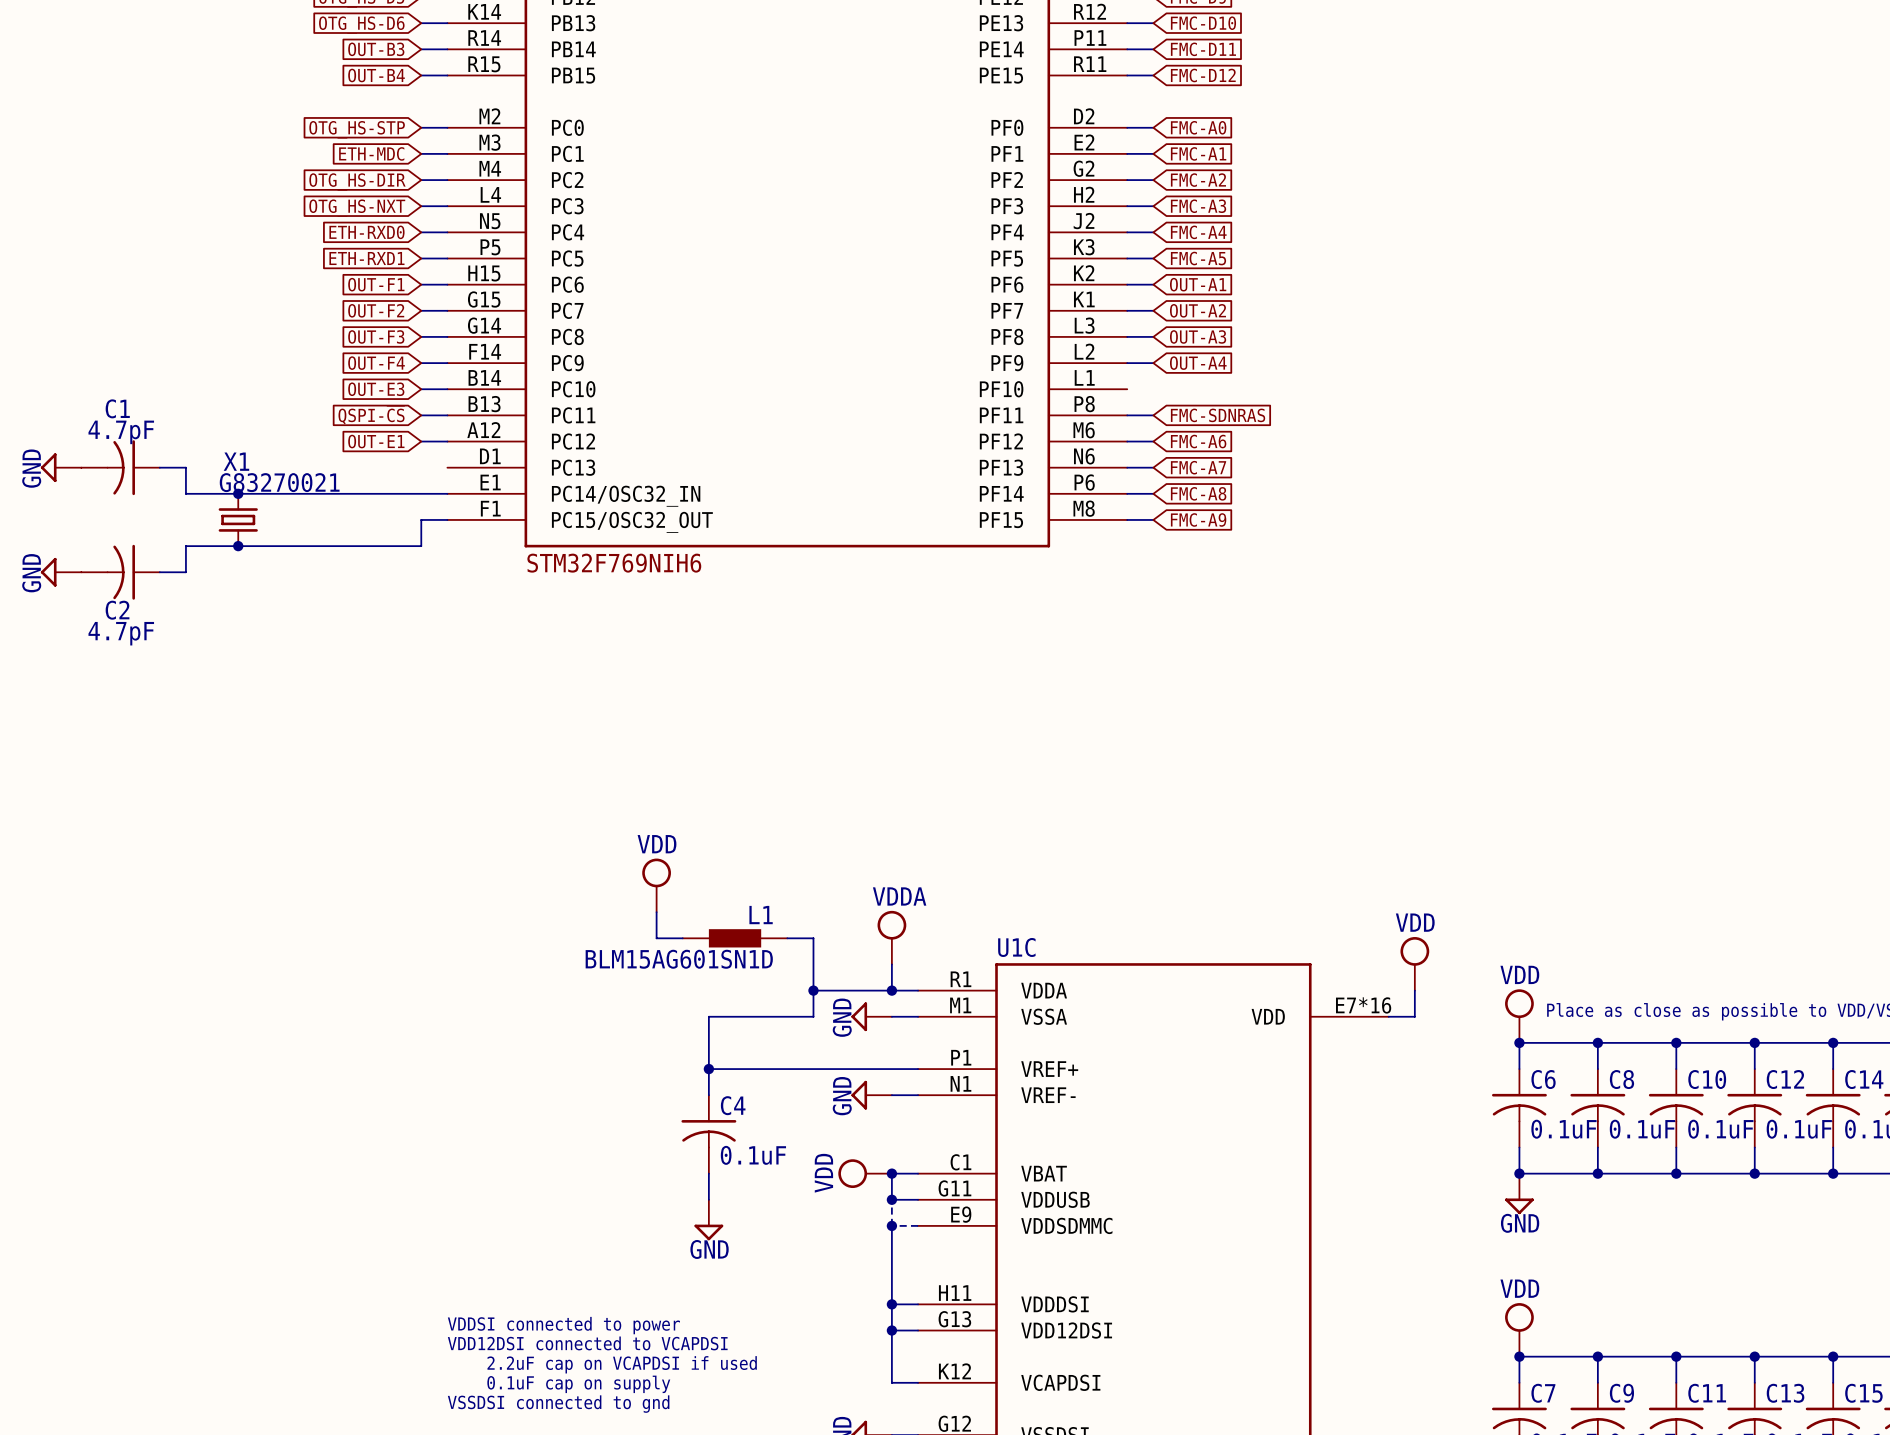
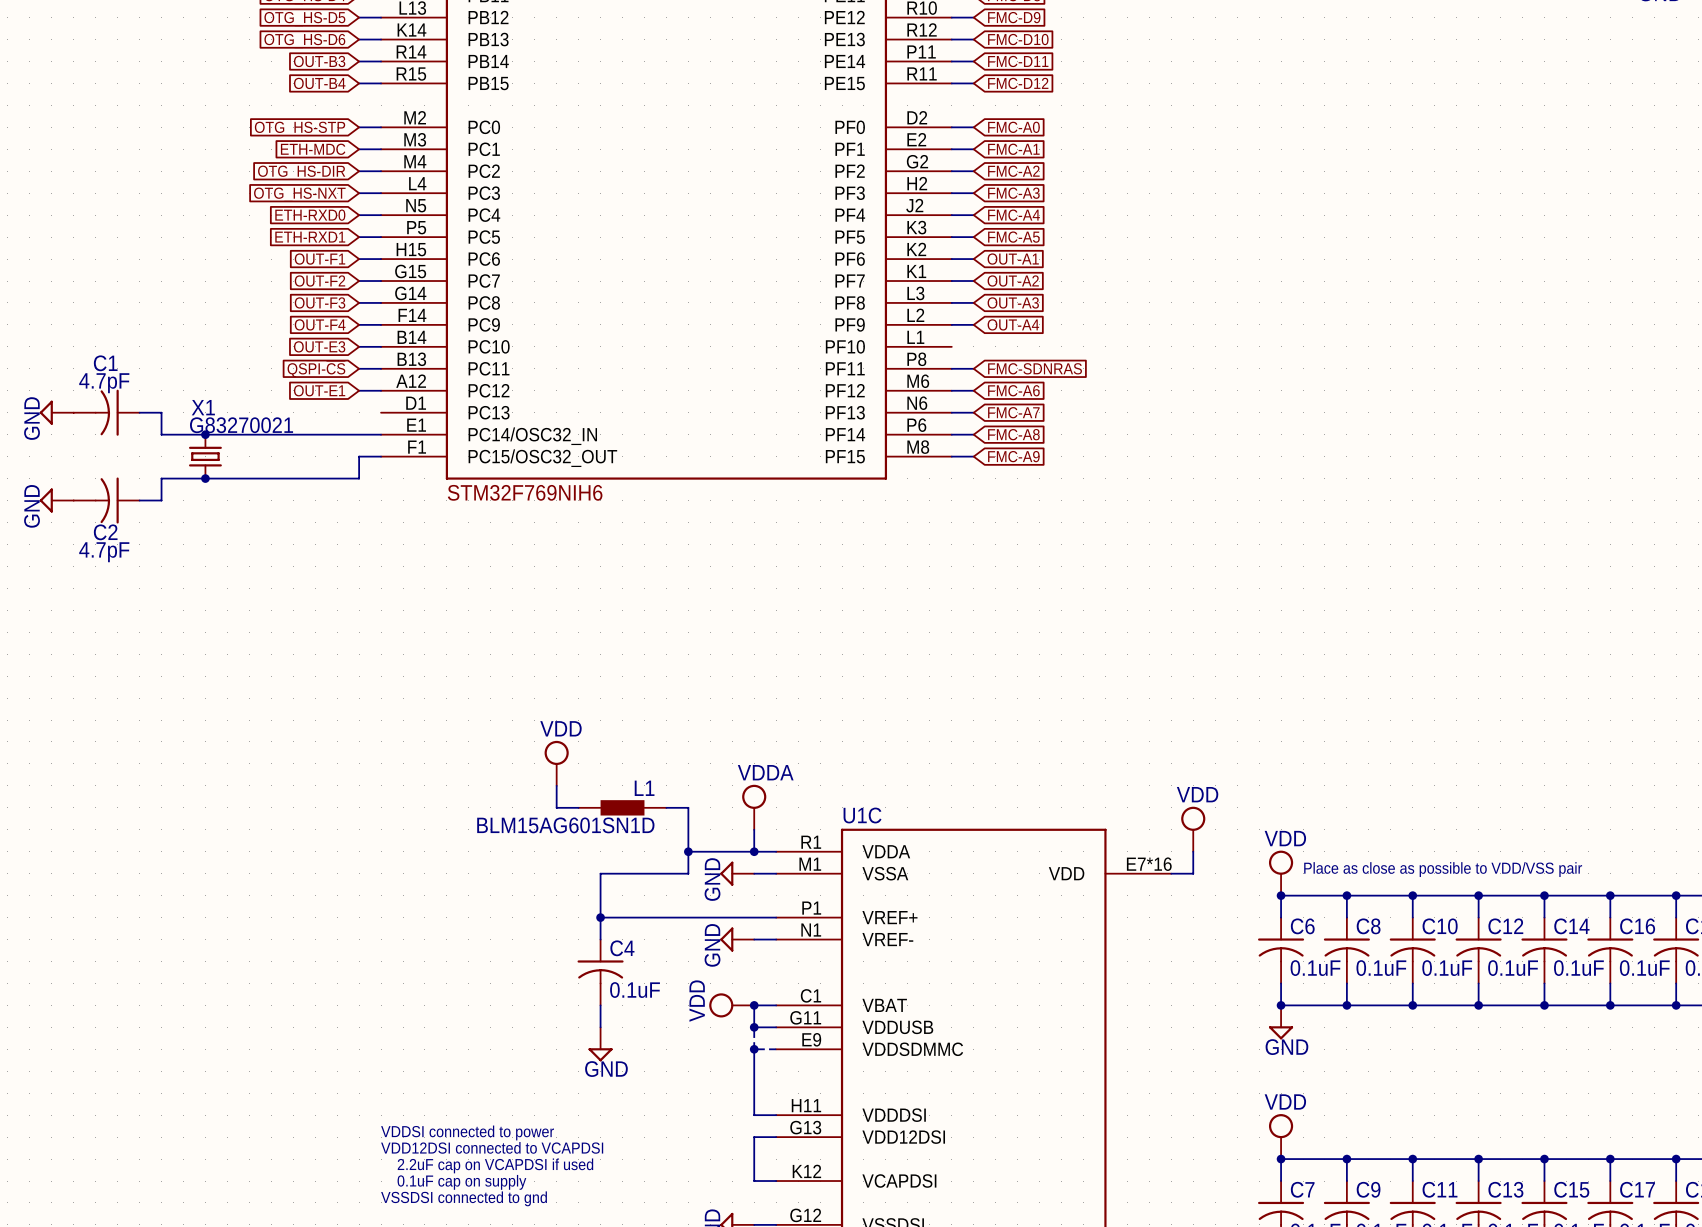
wire: (891, 1304) (891, 1330) -> none
junction: (891, 1304) -> none
junction: (891, 1330) -> none

